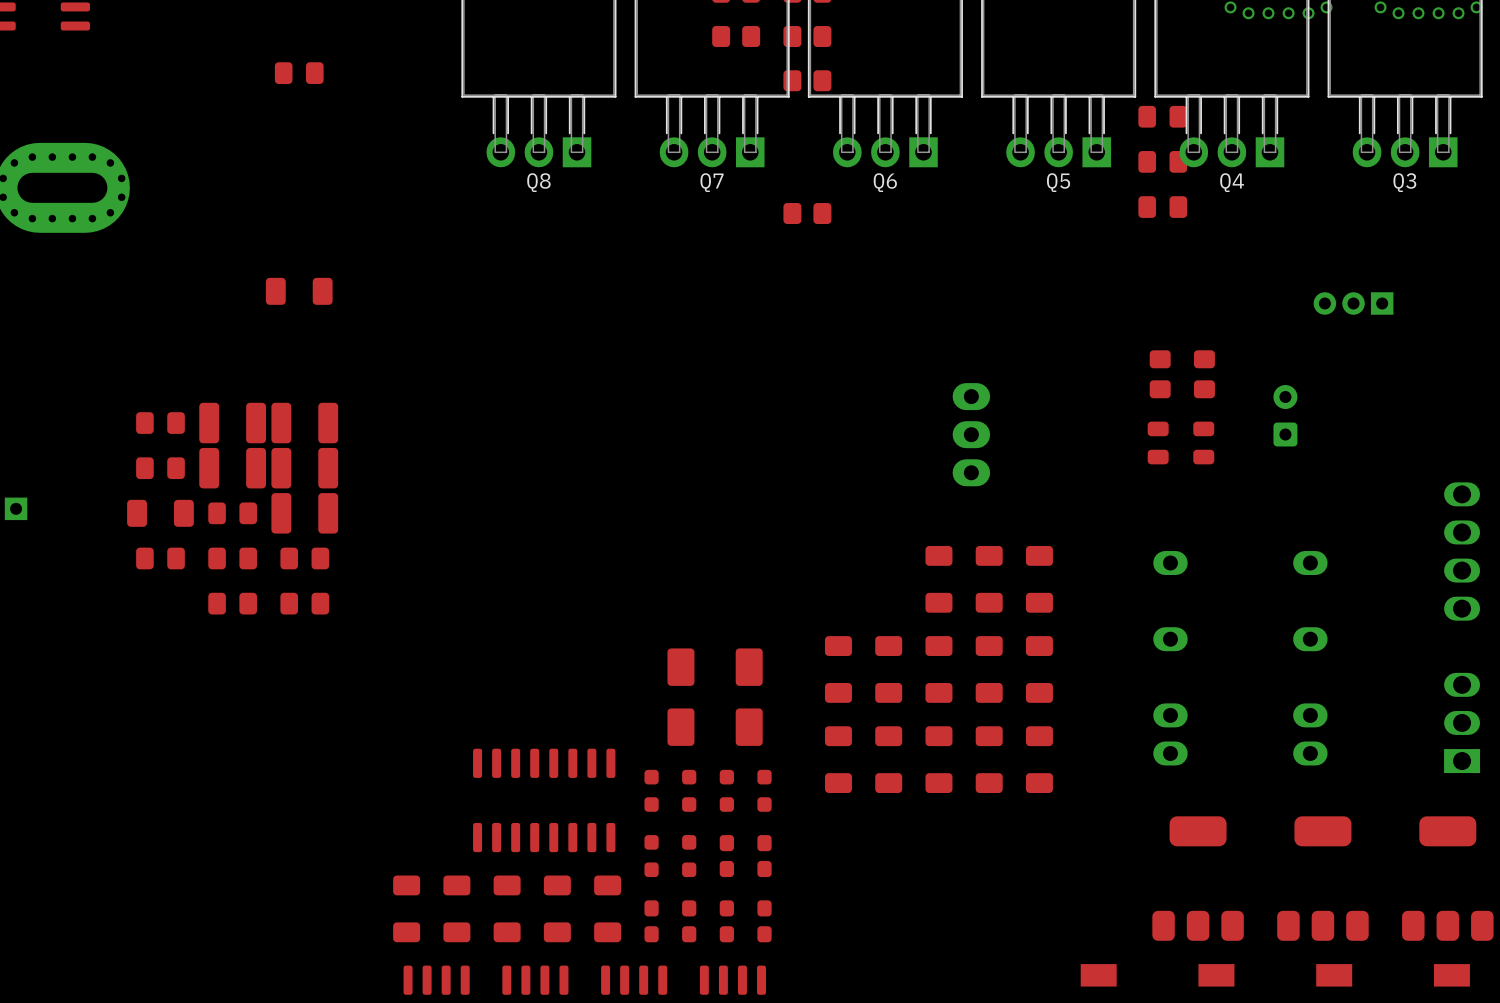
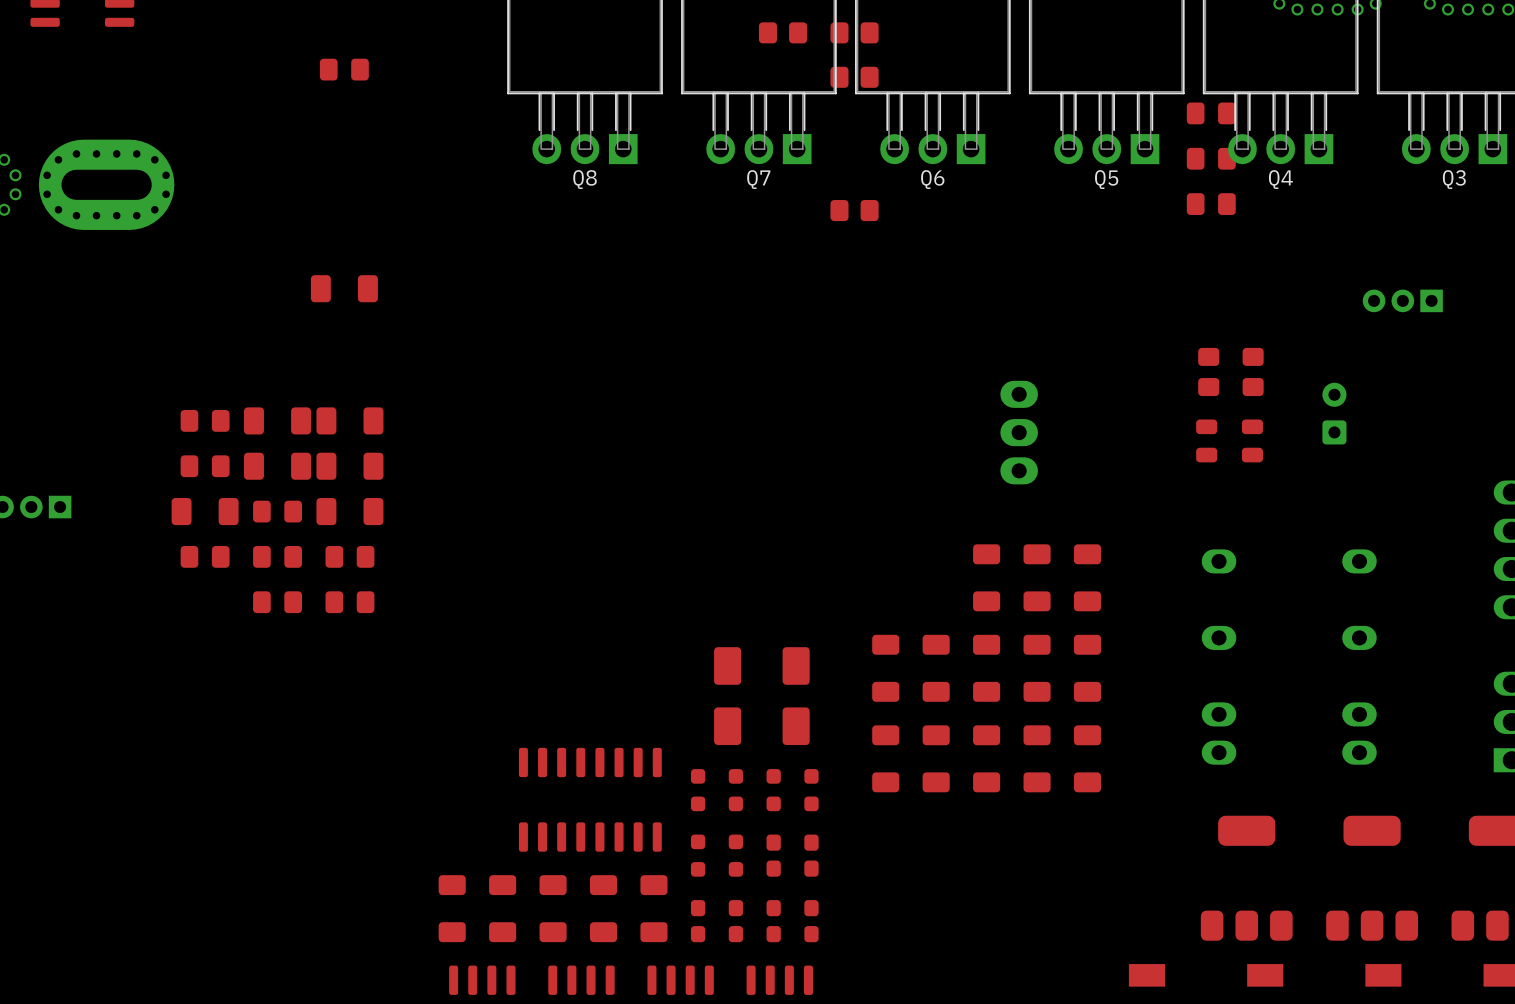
part footprint: [199, 402, 267, 444] -> [244, 407, 312, 435]
part footprint: [271, 402, 339, 444] -> [316, 407, 384, 435]
part footprint: [199, 447, 267, 489] -> [244, 452, 312, 480]
part footprint: [271, 447, 339, 489] -> [316, 452, 384, 480]
part footprint: [271, 493, 339, 534] -> [316, 498, 384, 526]

